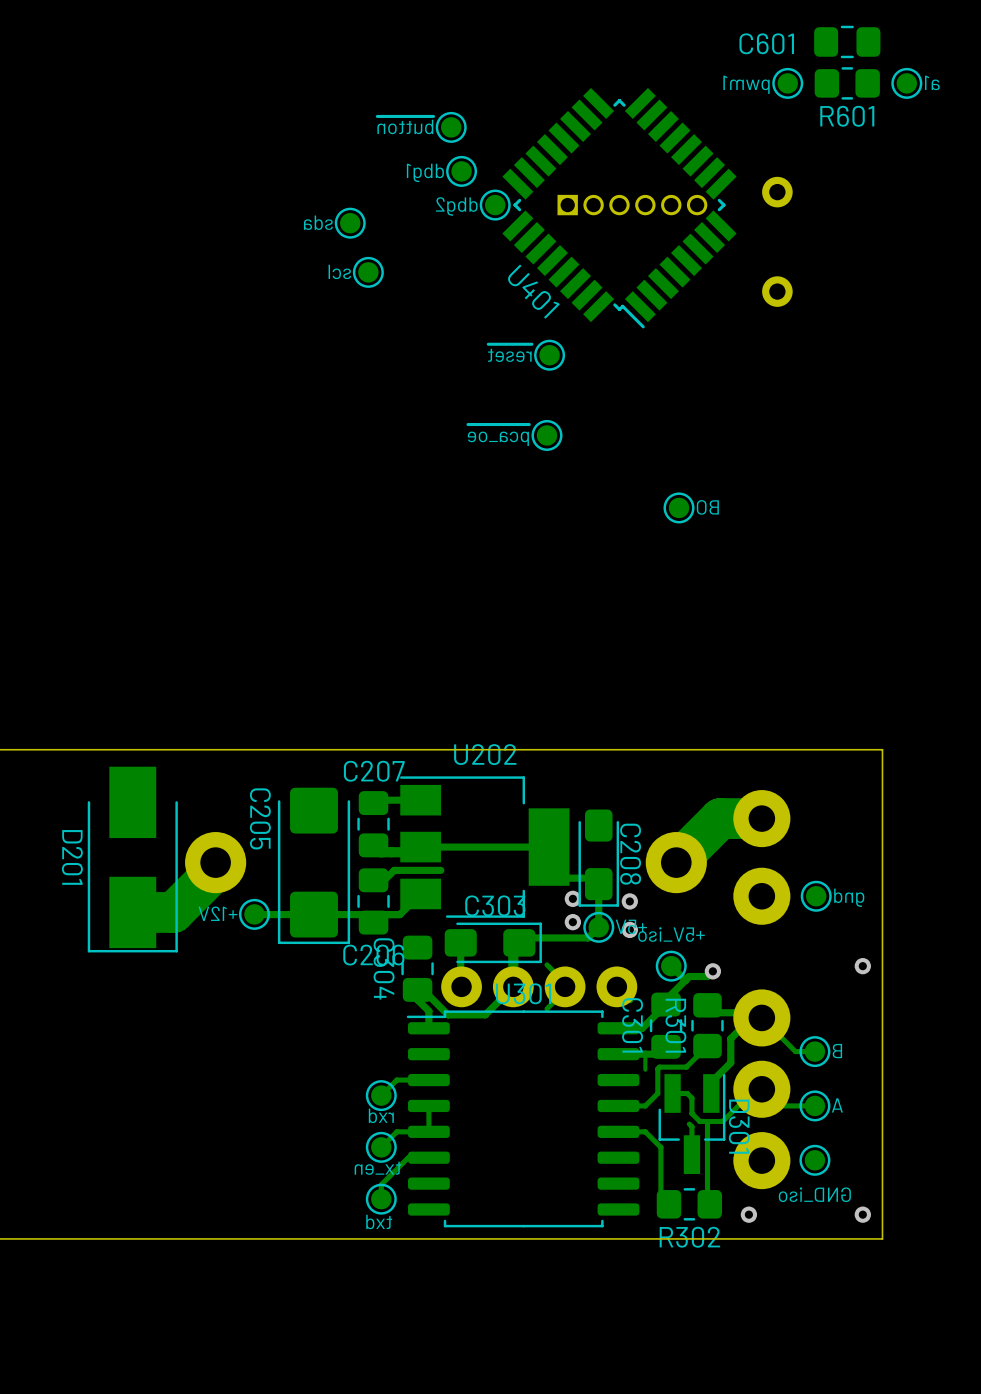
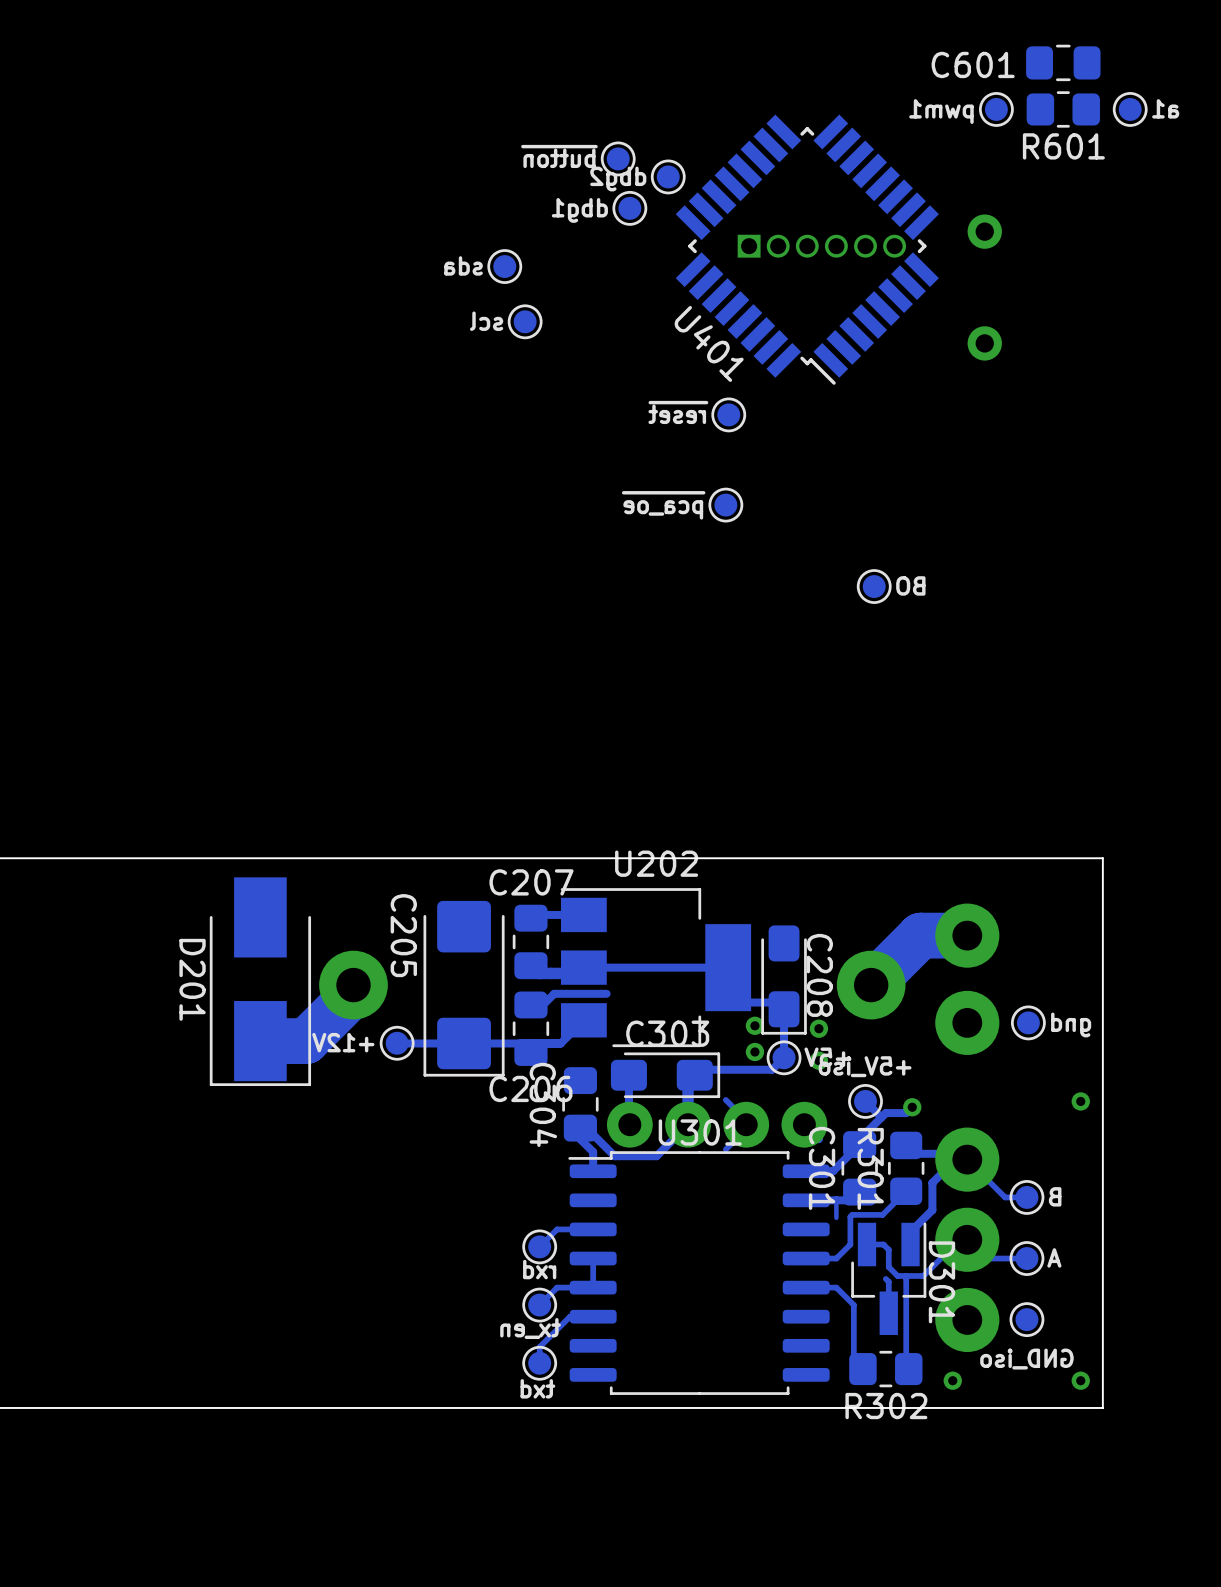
part position: (495, 205) -> (668, 176)

